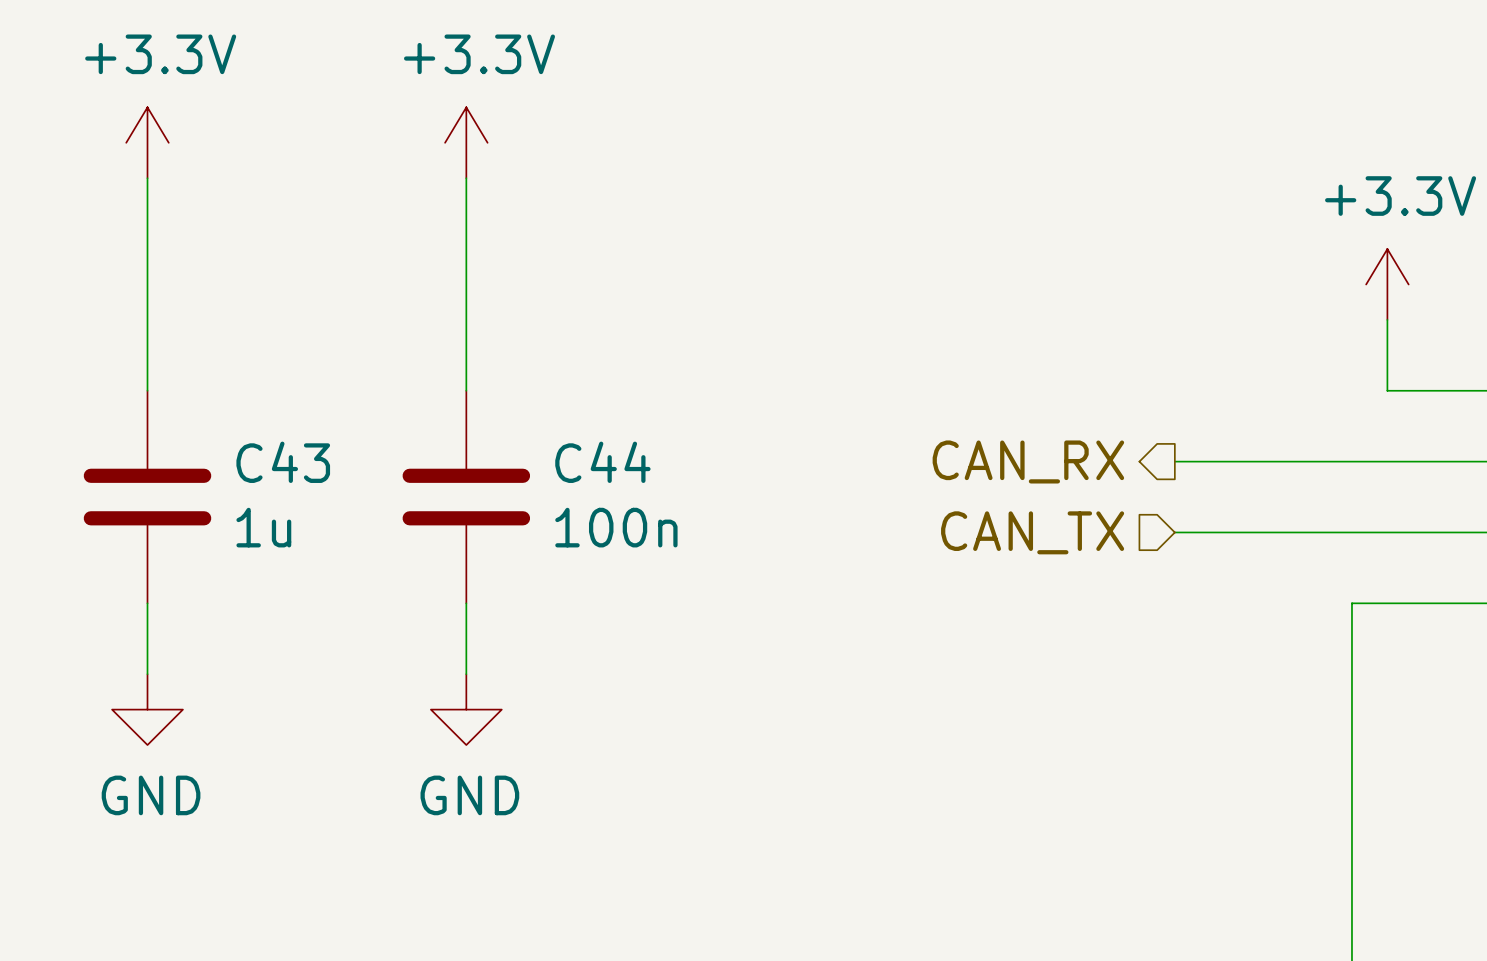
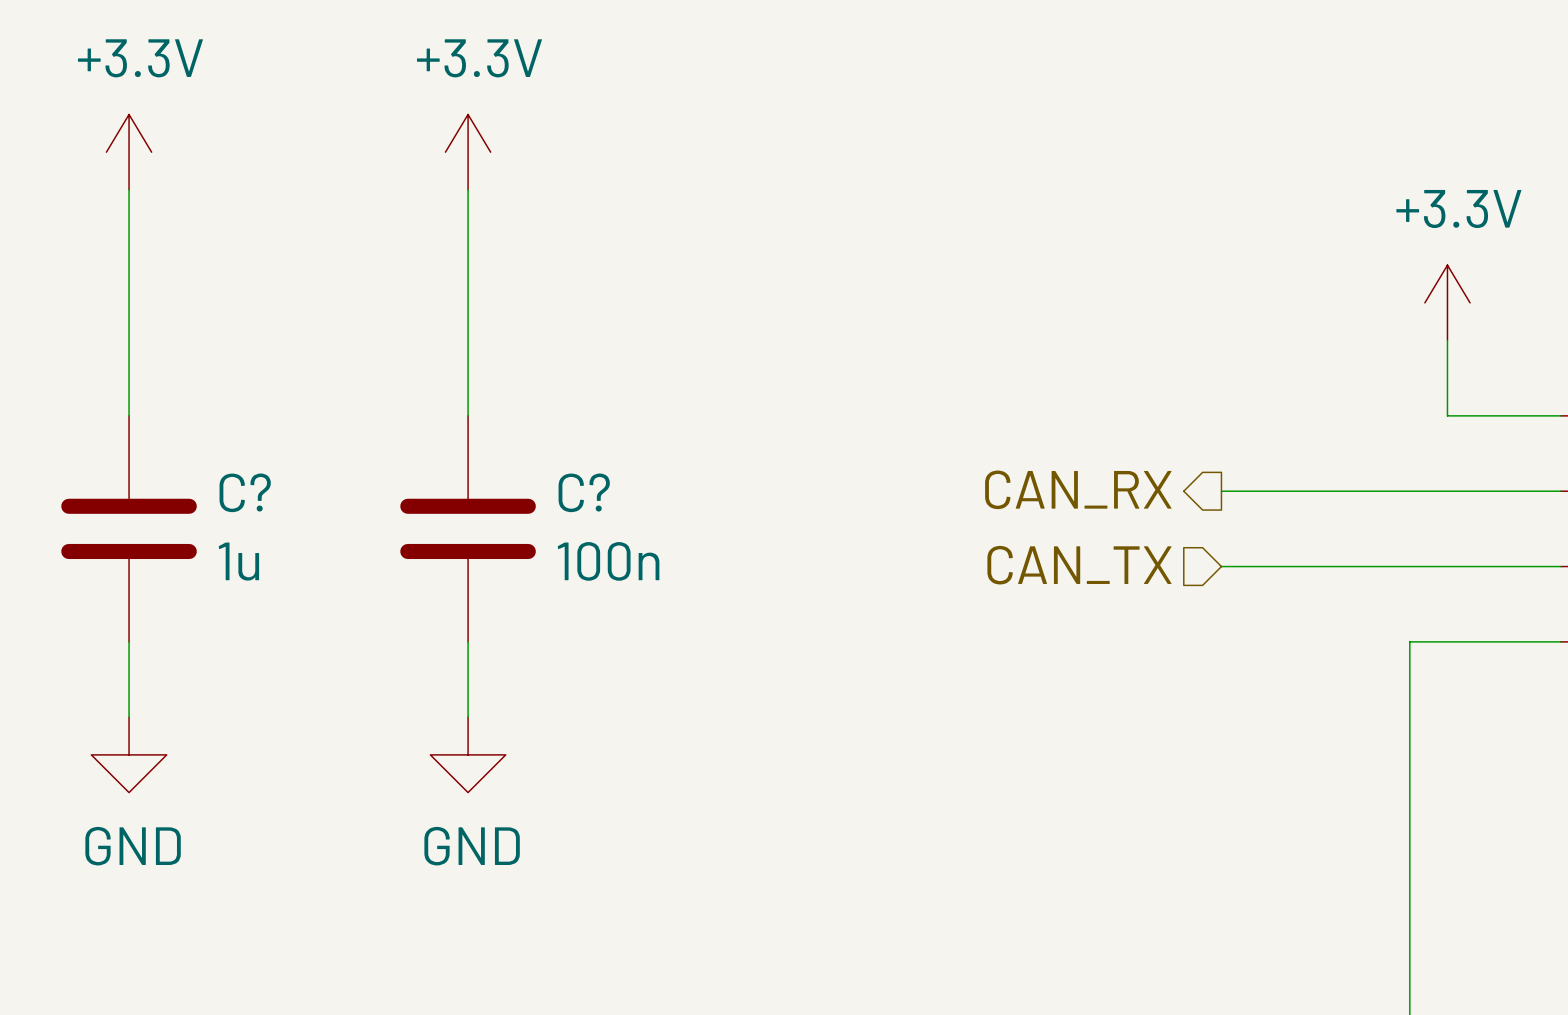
C43 name: C43 (283, 462) -> C? (245, 492)
C44 name: C44 (602, 462) -> C? (584, 492)

